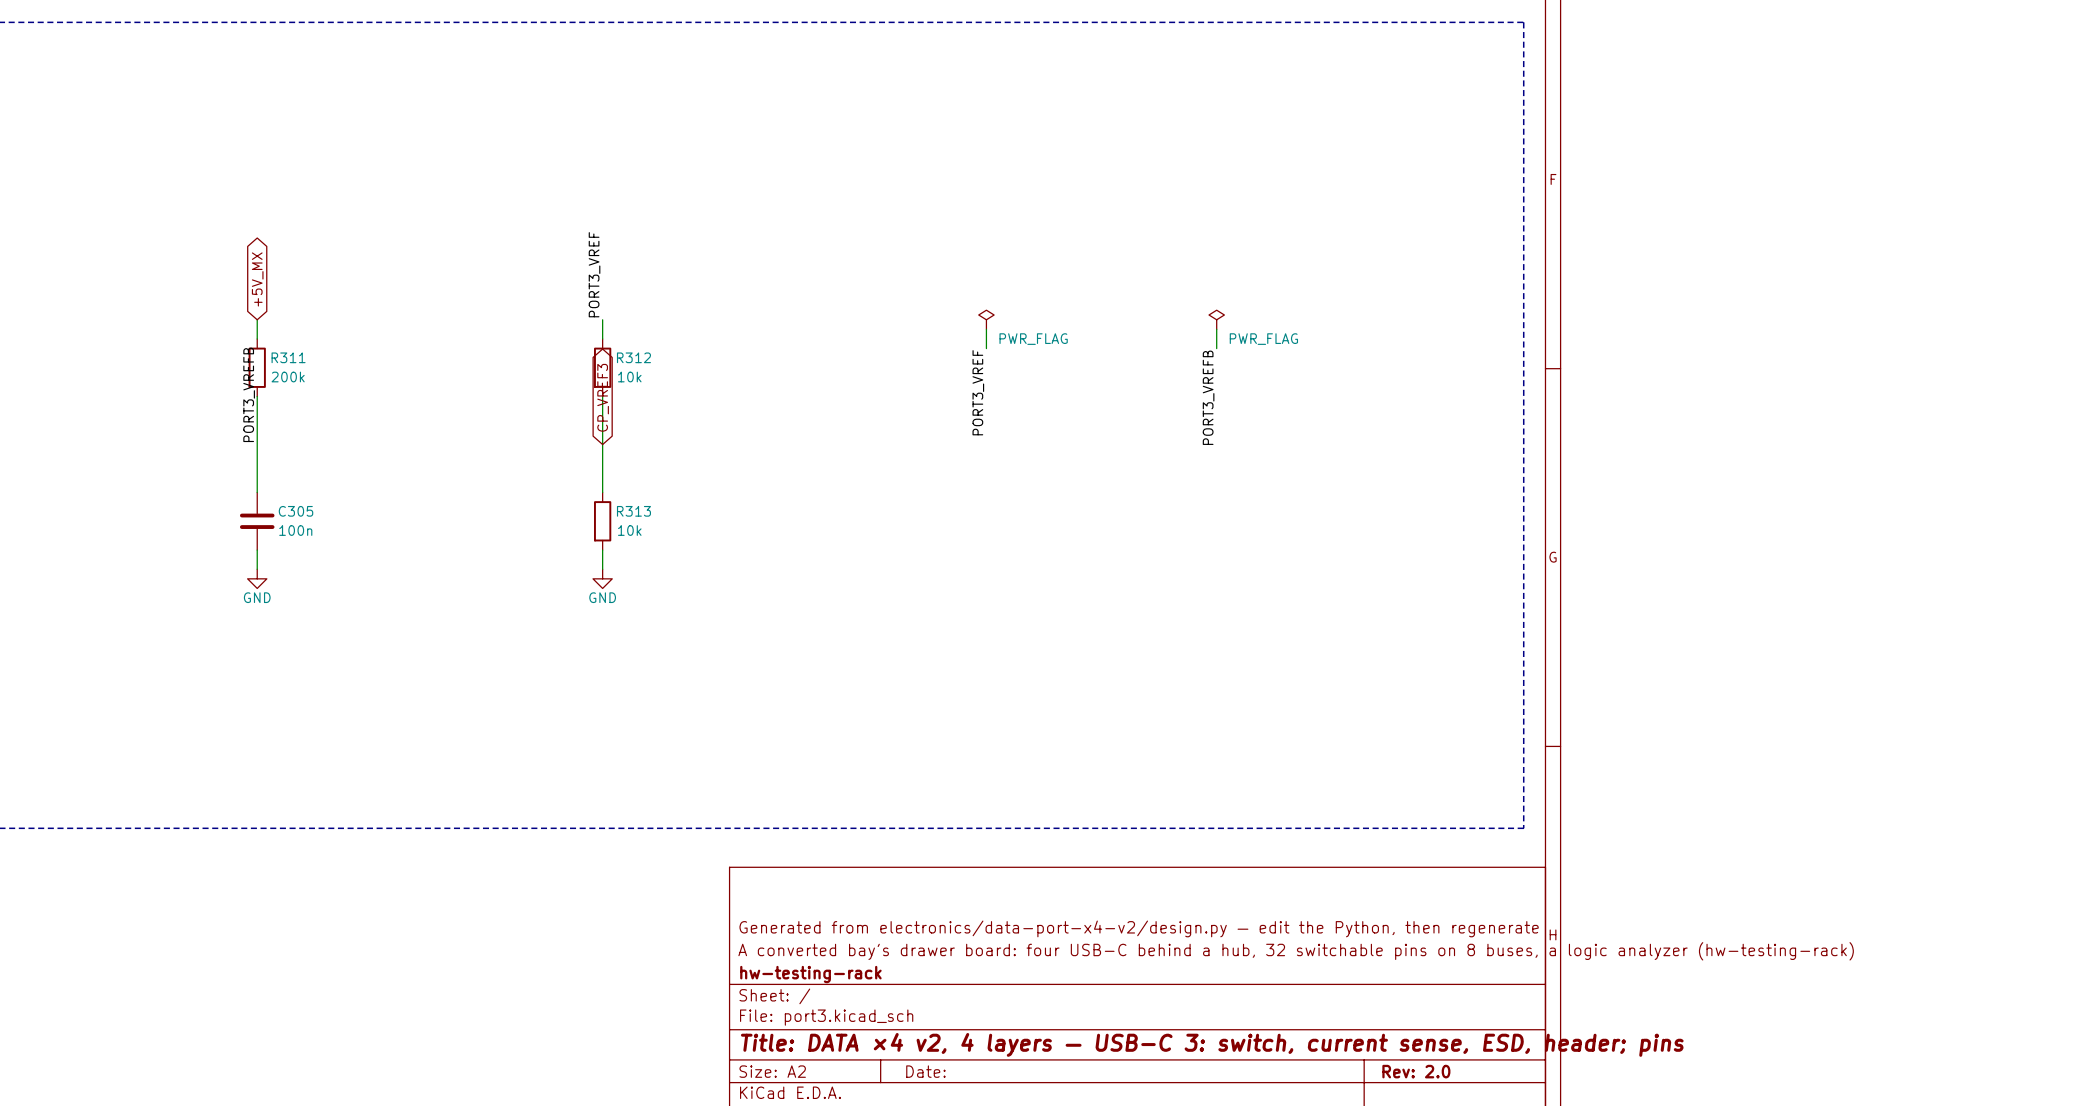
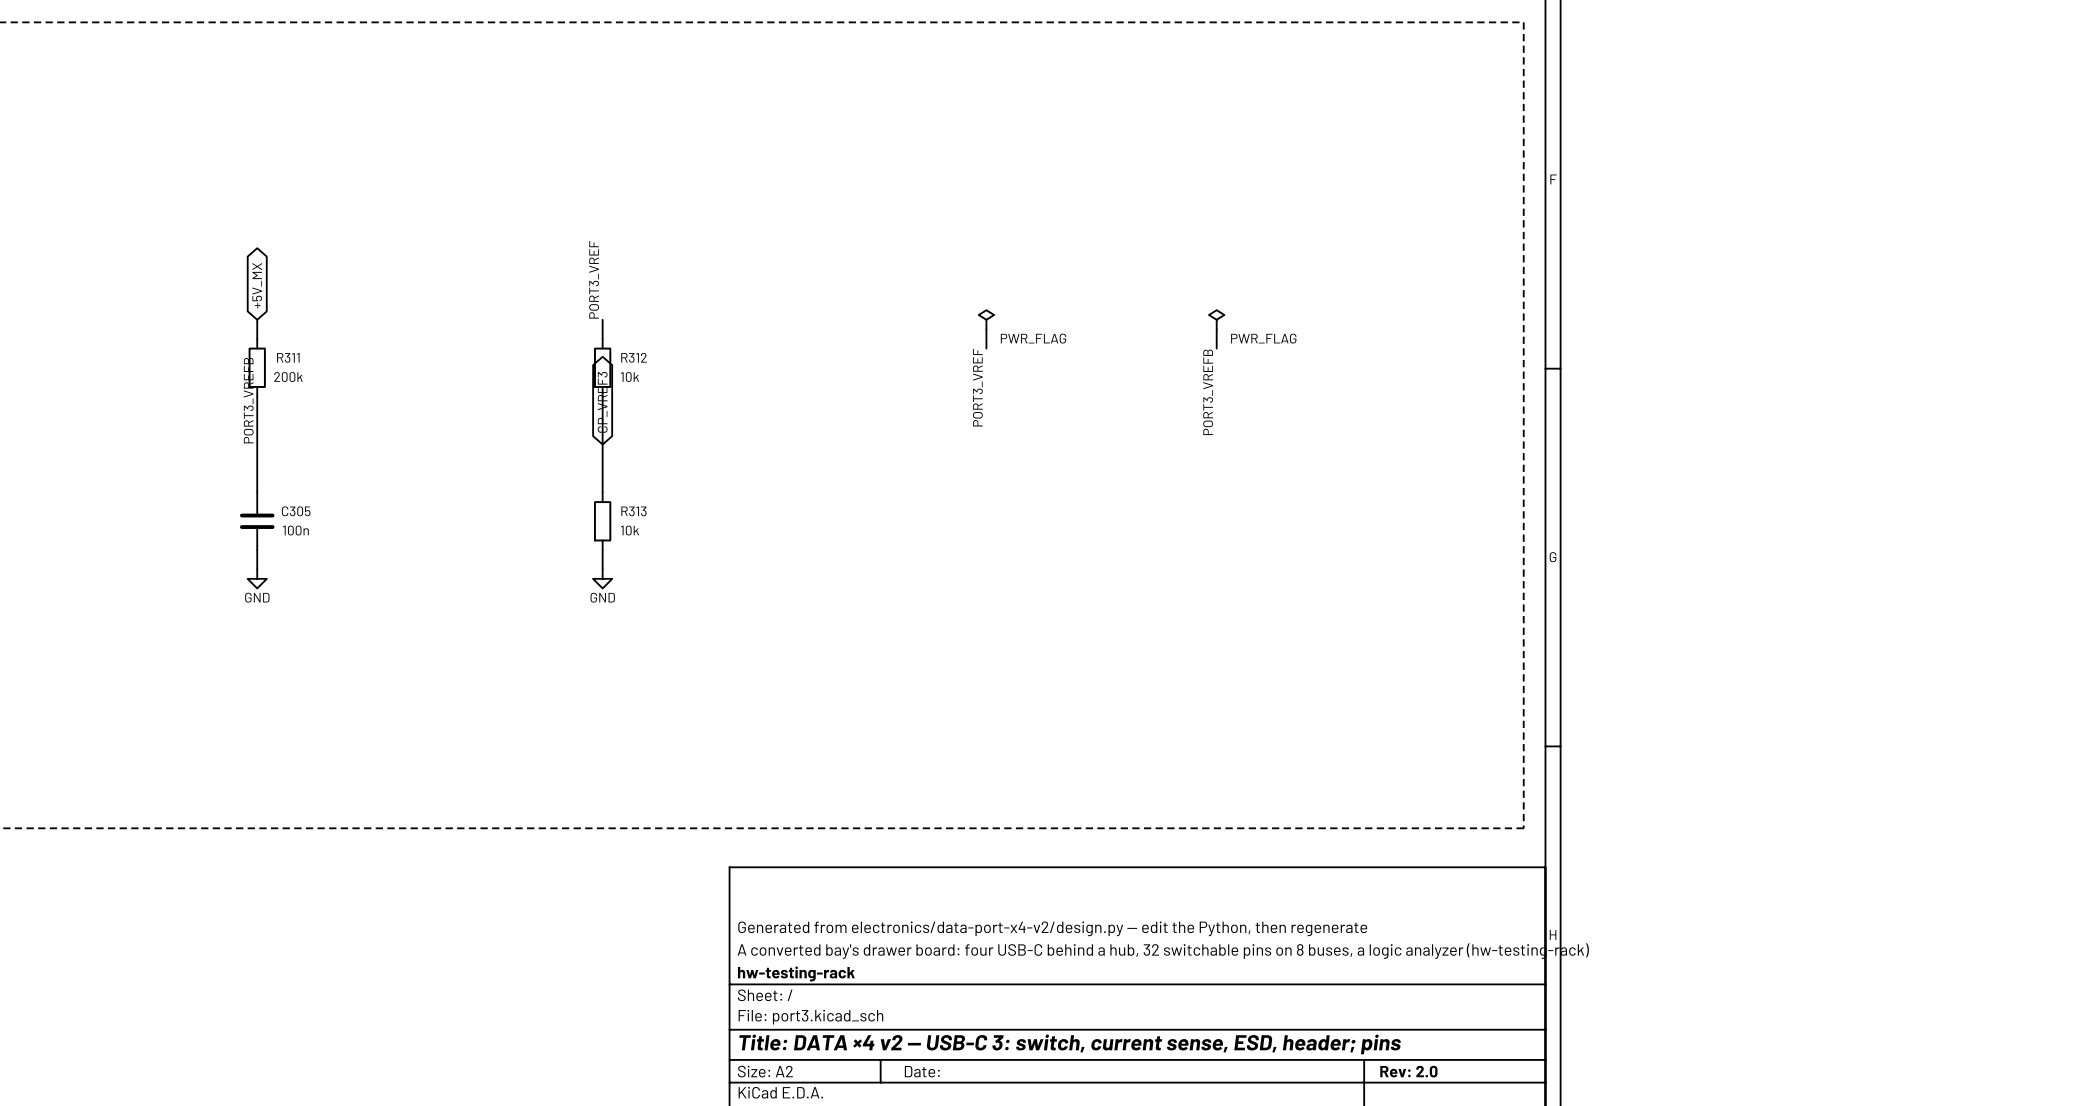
title block: Title: DATA ×4 v2, 4 layers — USB-C 3: switch, current sense, ESD, header; pins (1212, 1044) -> Title: DATA ×4 v2 — USB-C 3: switch, current sense, ESD, header; pins (1070, 1044)

